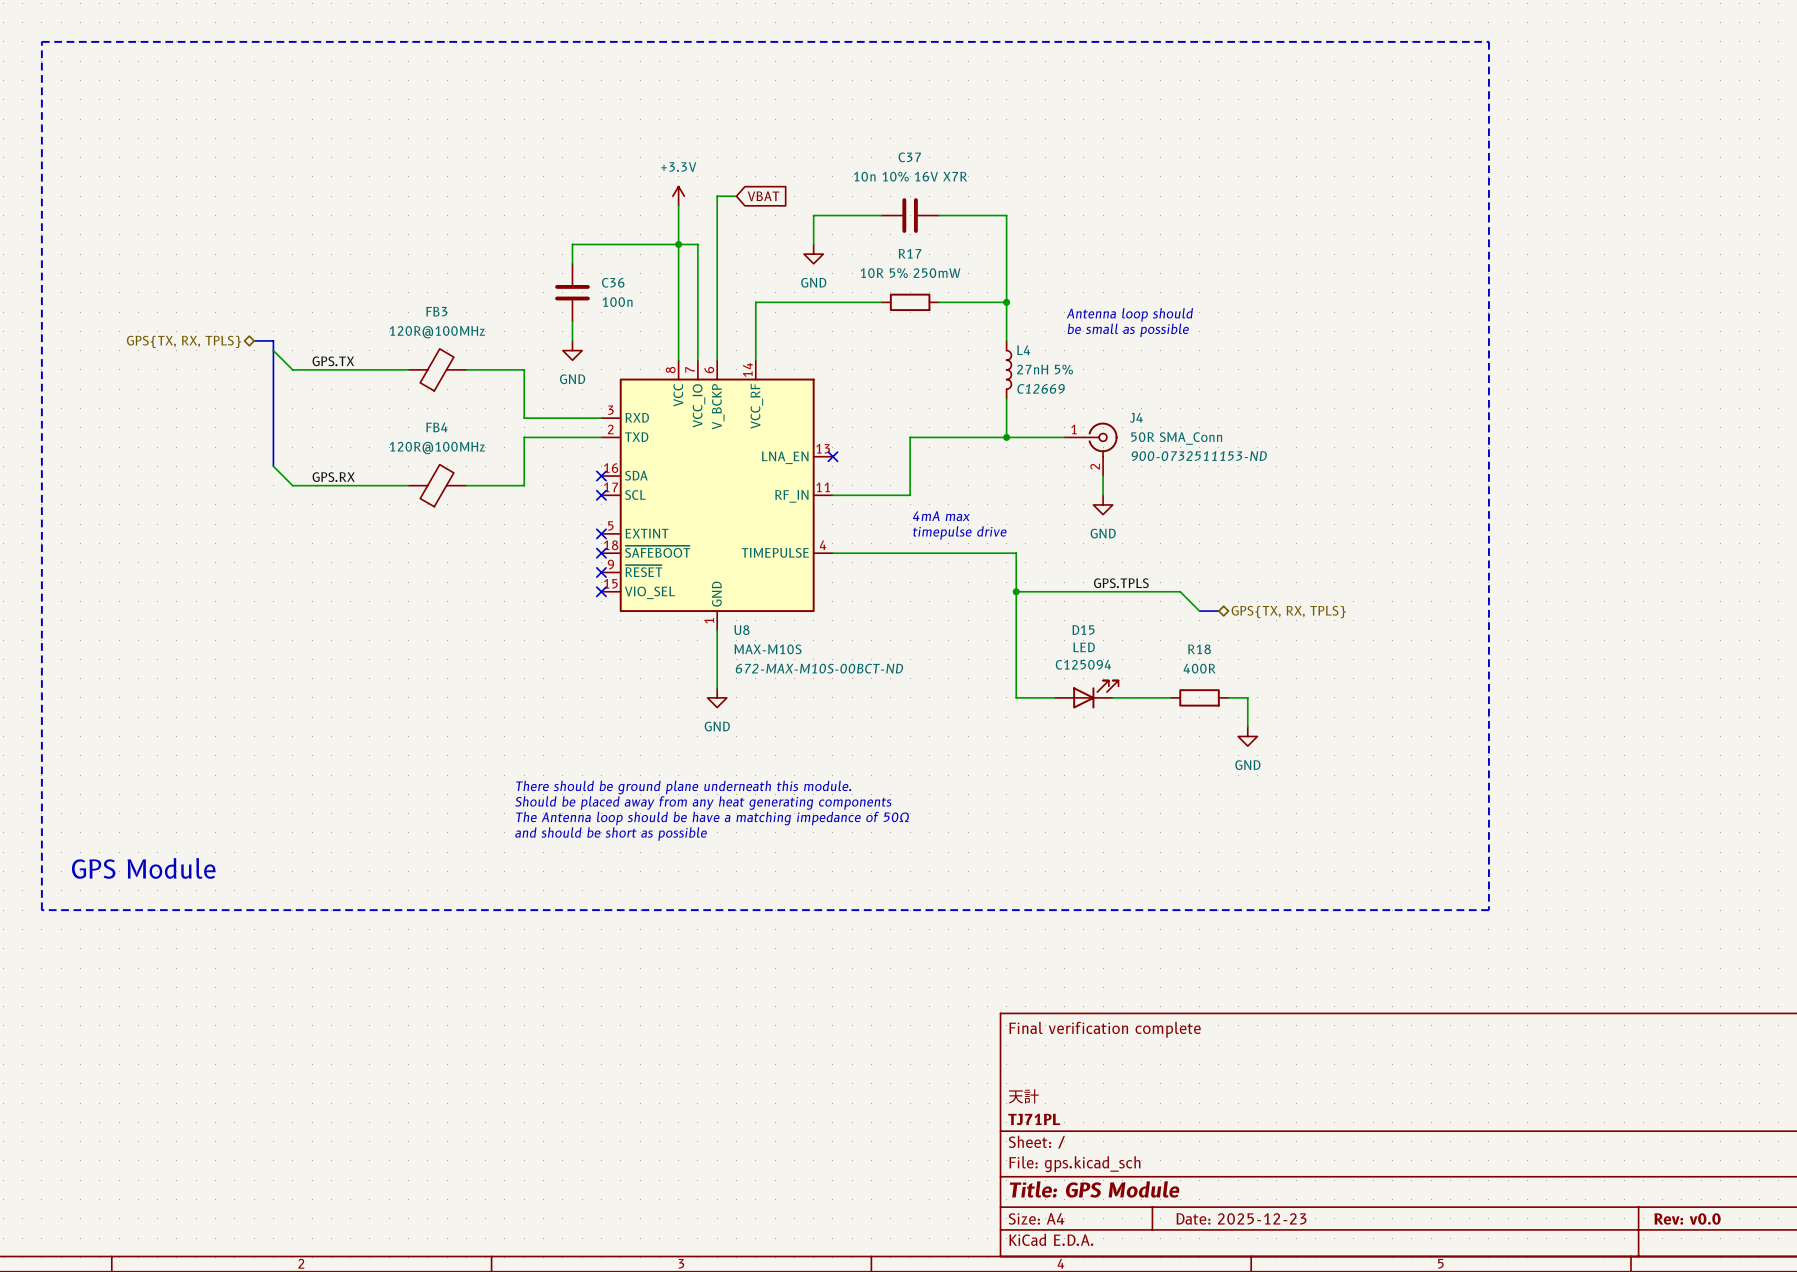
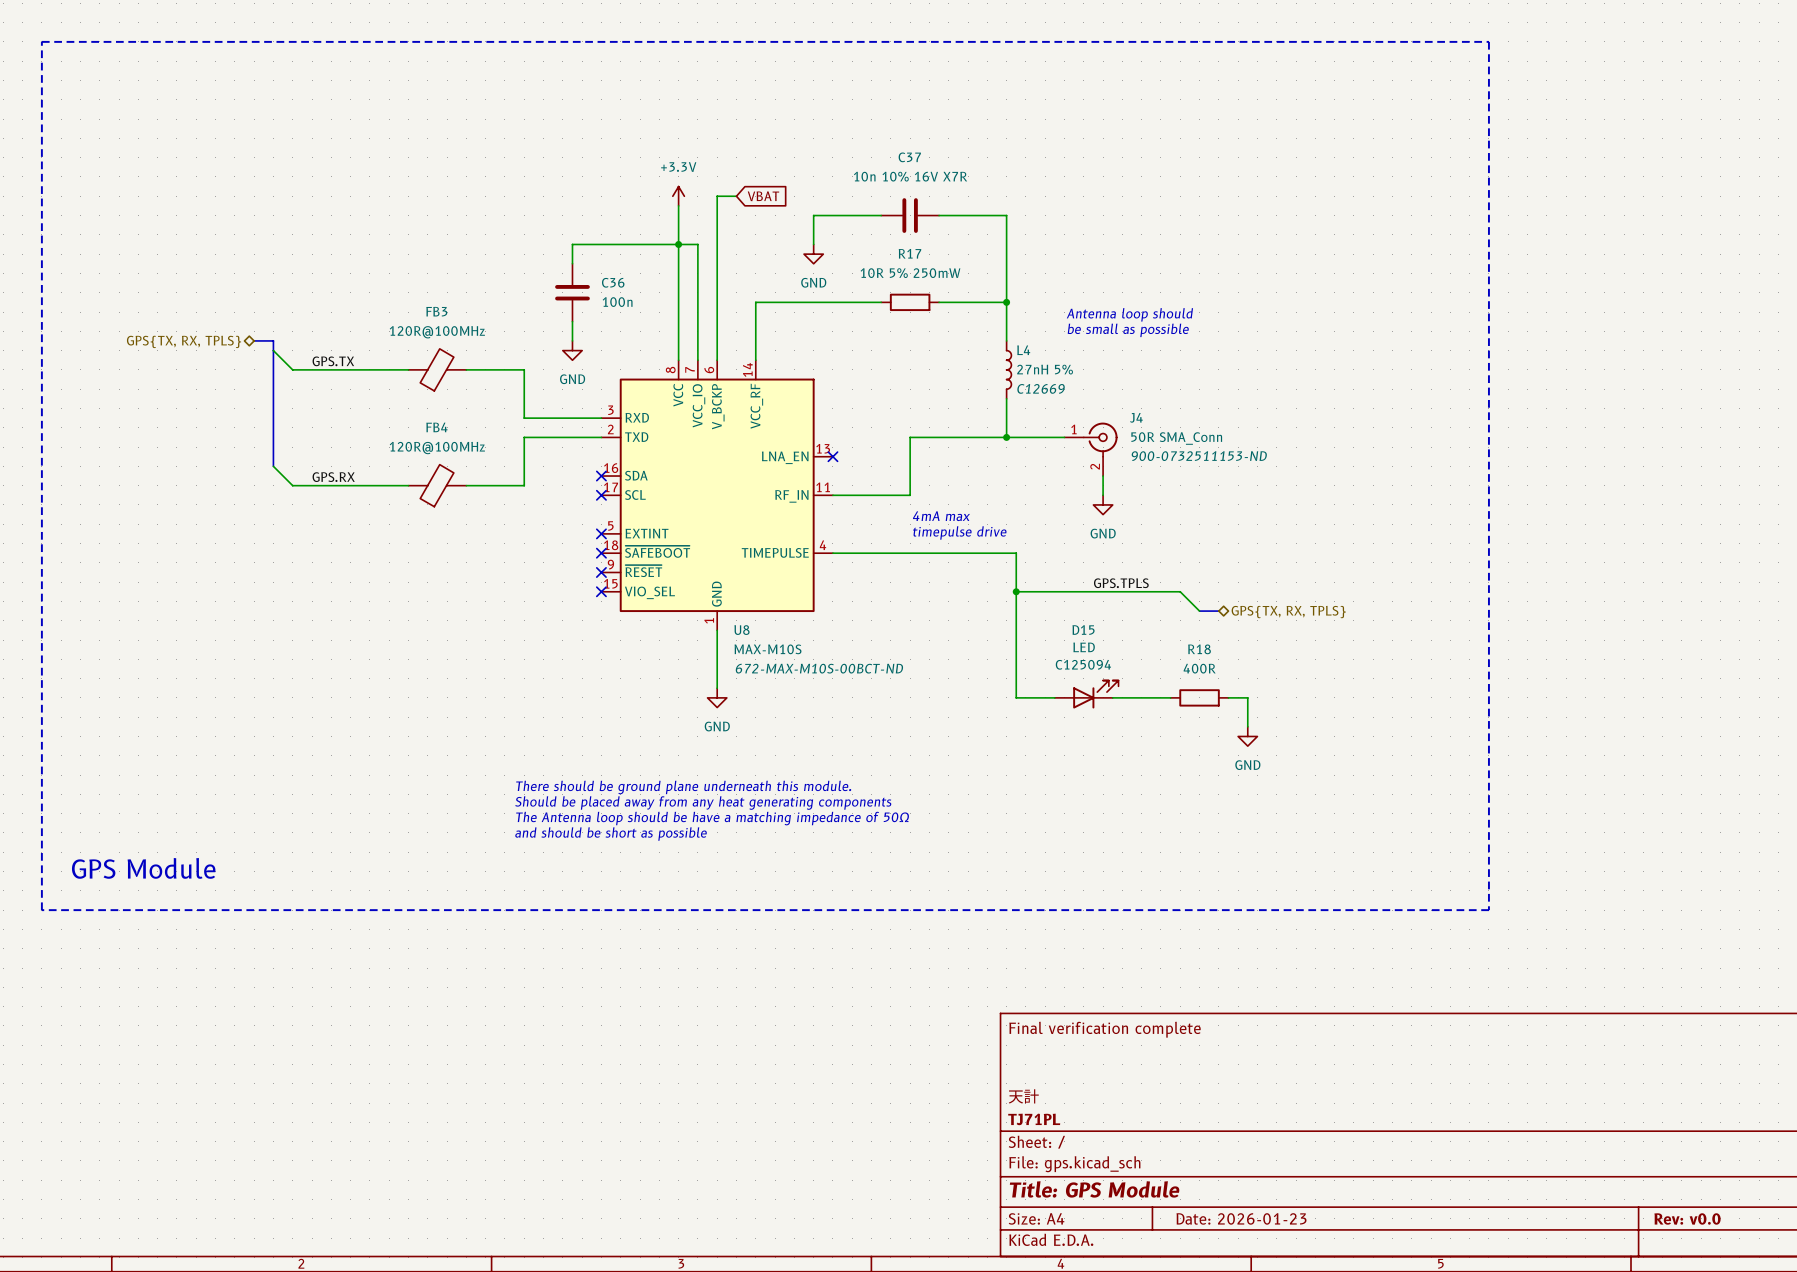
title block: Date: 2025-12-23 (1241, 1218) -> Date: 2026-01-23 (1241, 1218)

